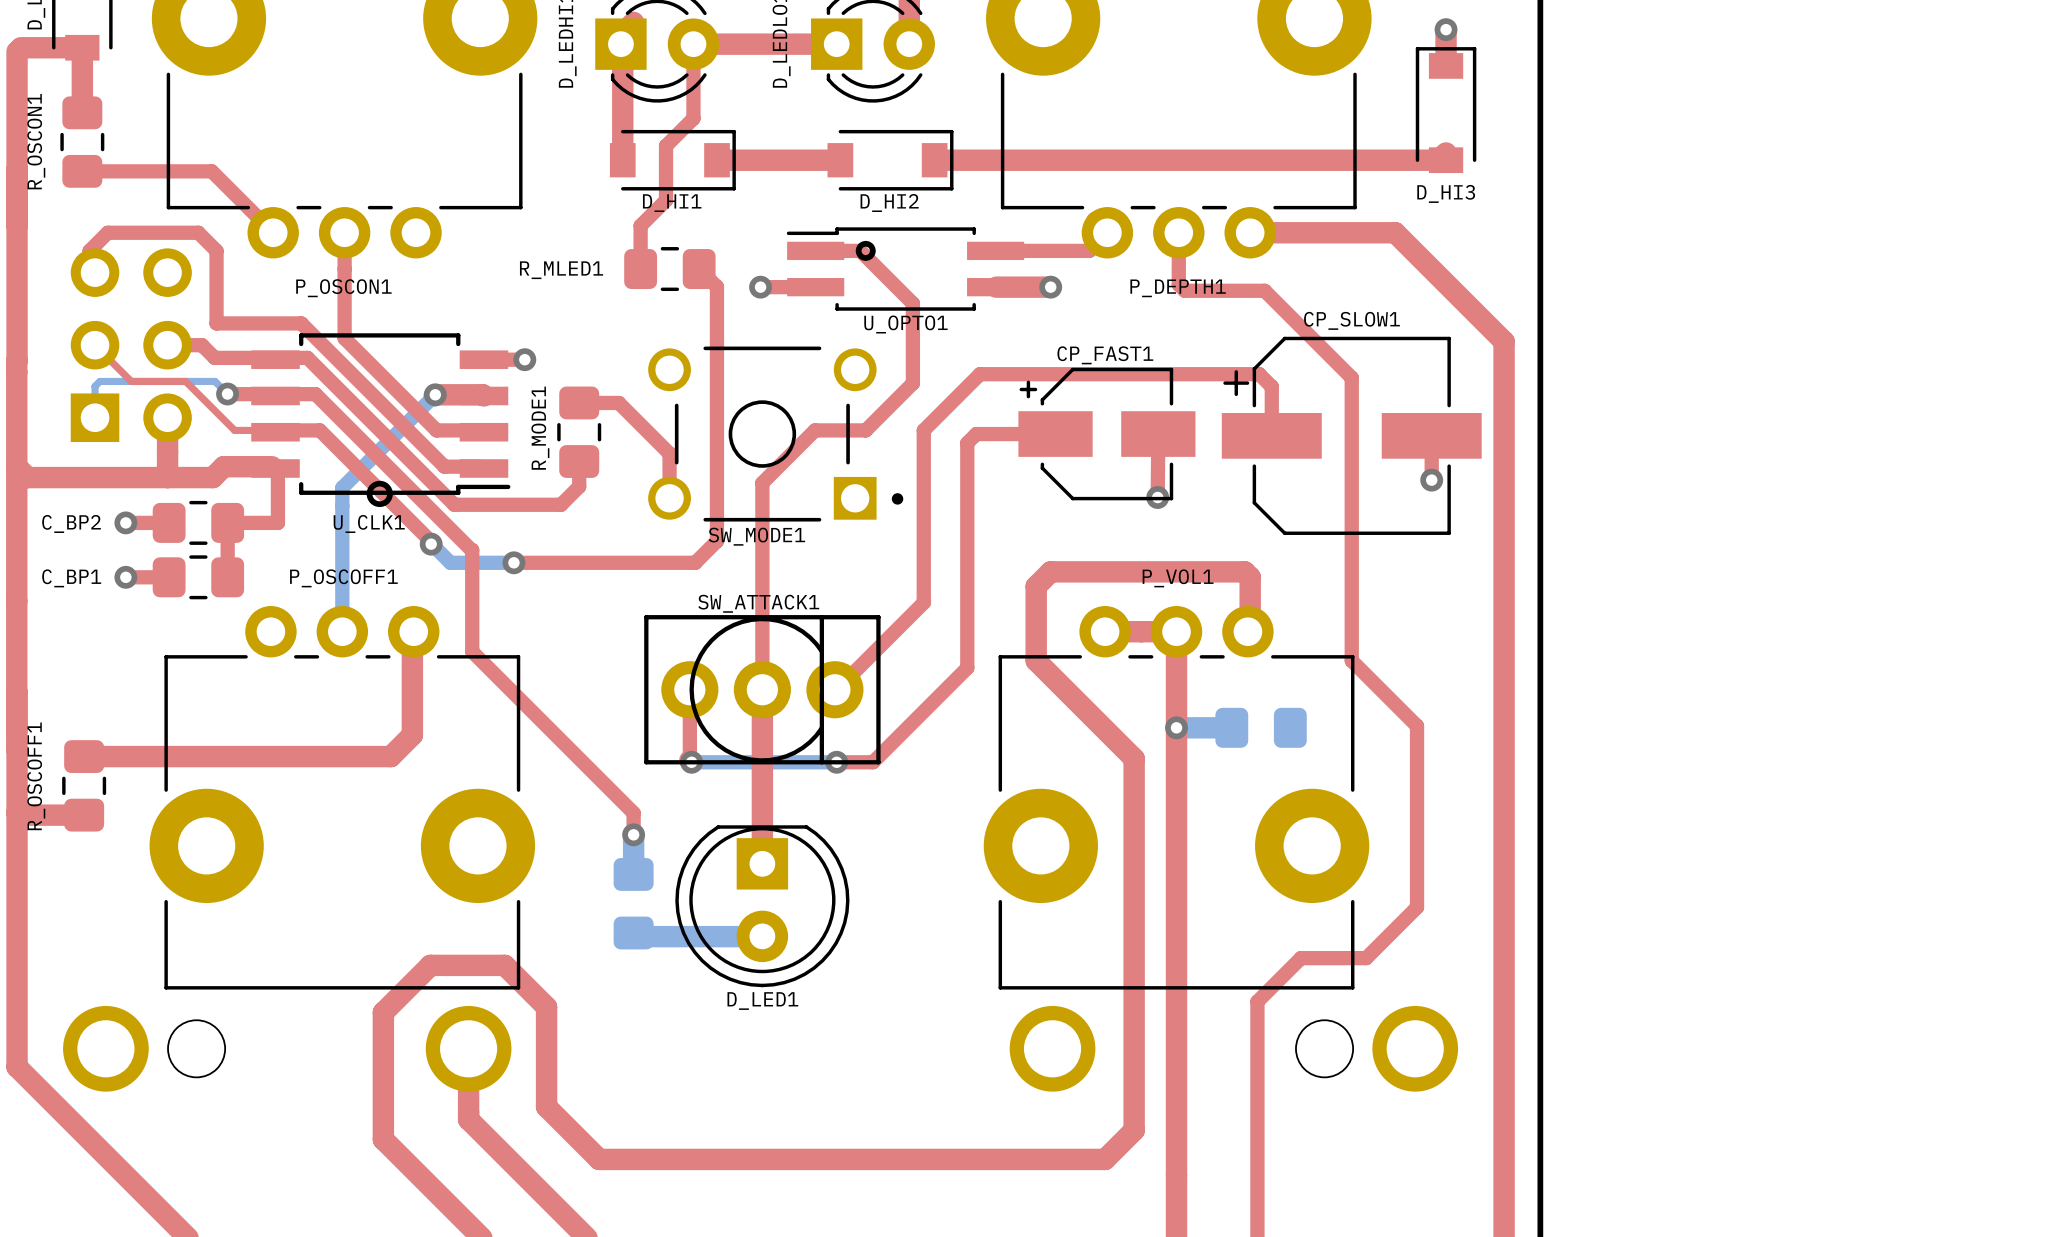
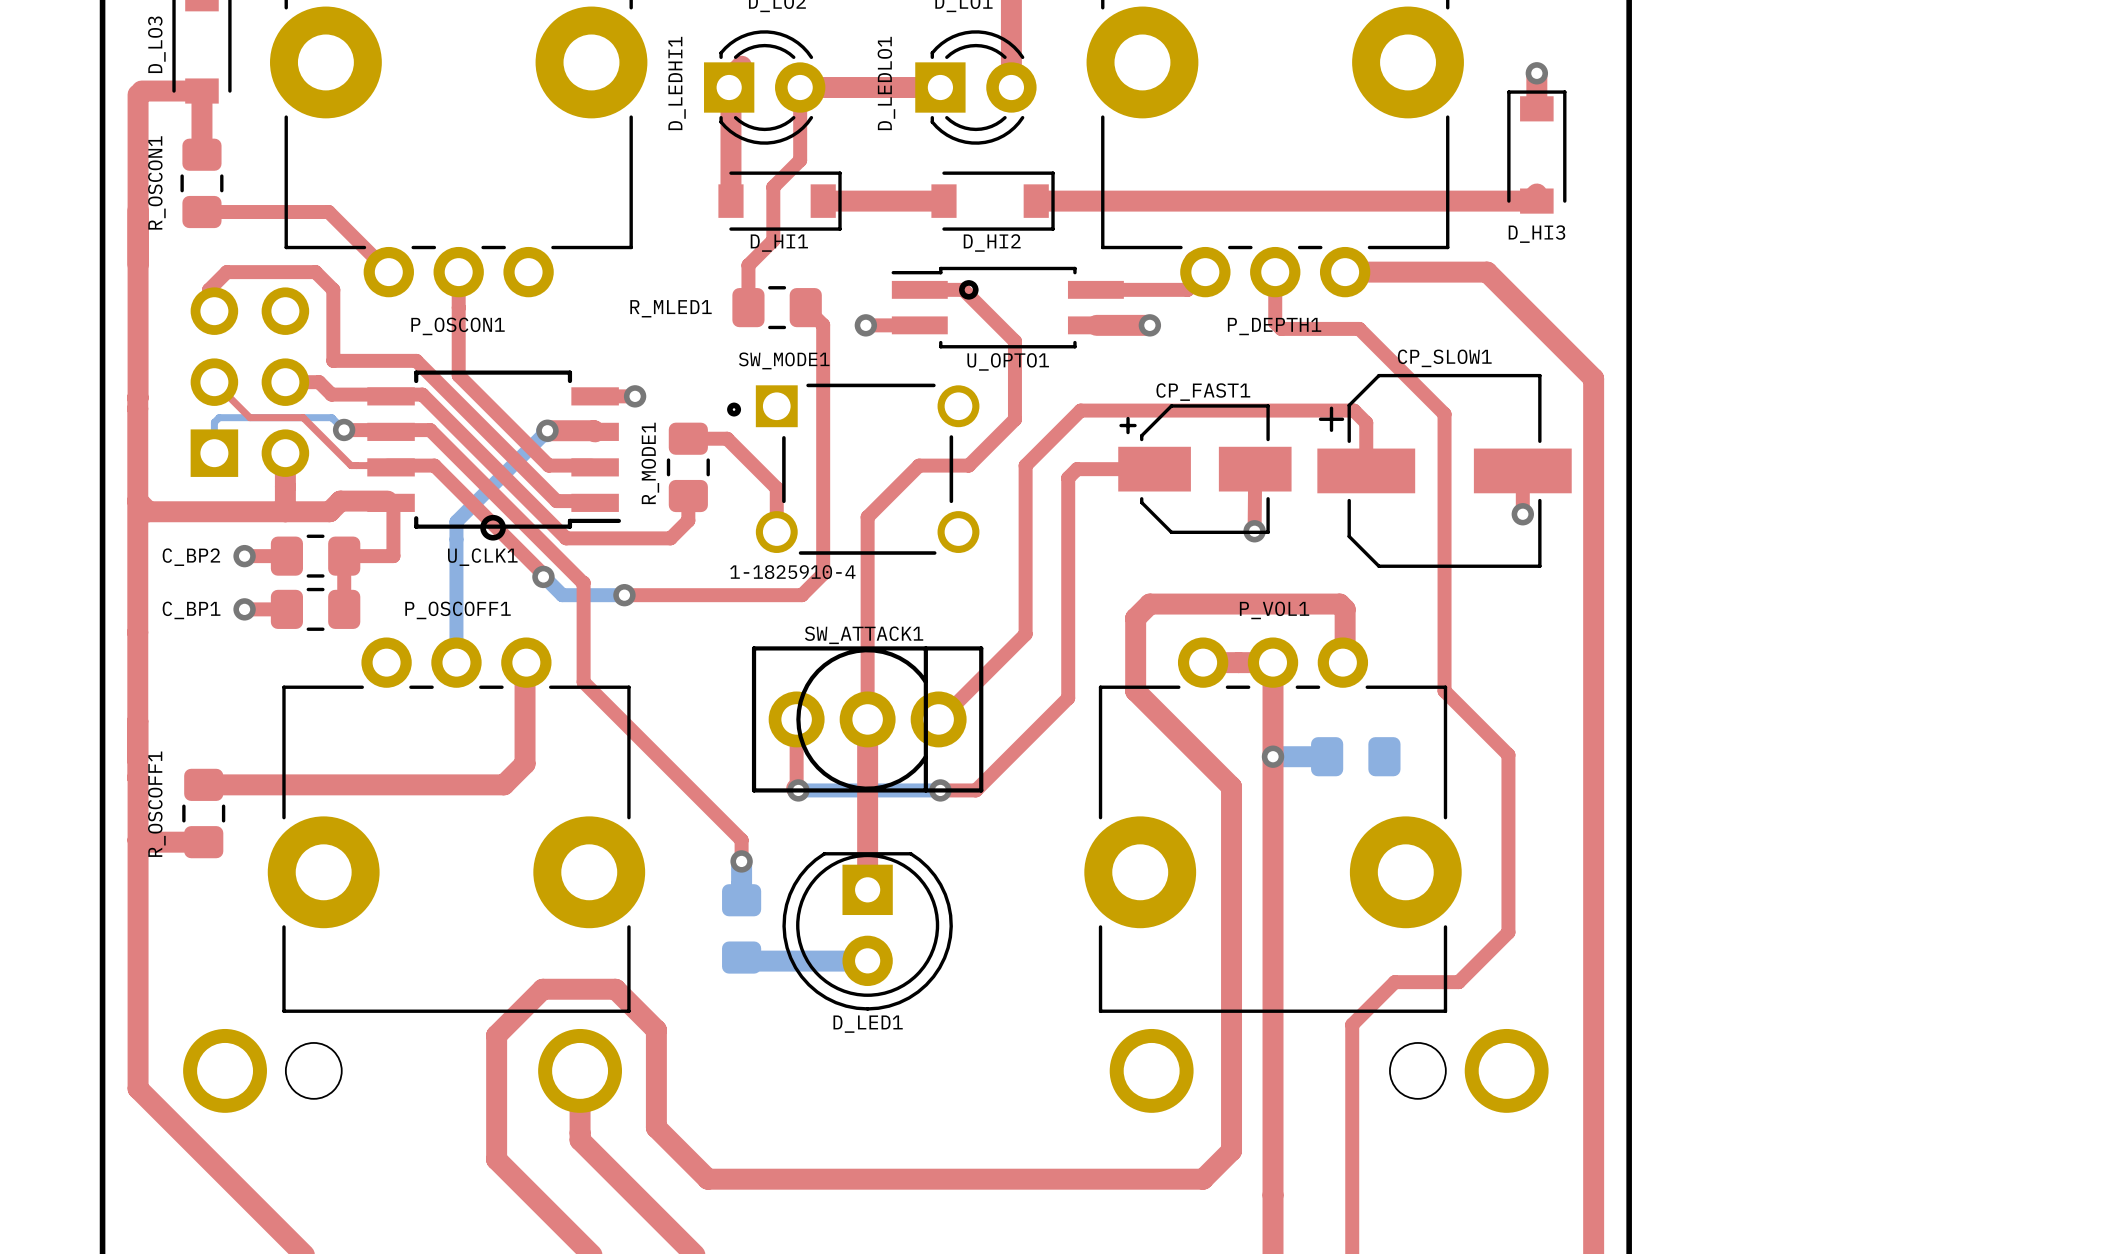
SW_MODE1 footprint: [648, 346, 904, 522] -> [727, 383, 980, 555]
SW_MODE1 name position: SW_MODE1 (756, 536) -> SW_MODE1 (784, 360)
SW_MODE1 value: none -> 1-1825910-4 (792, 572)

